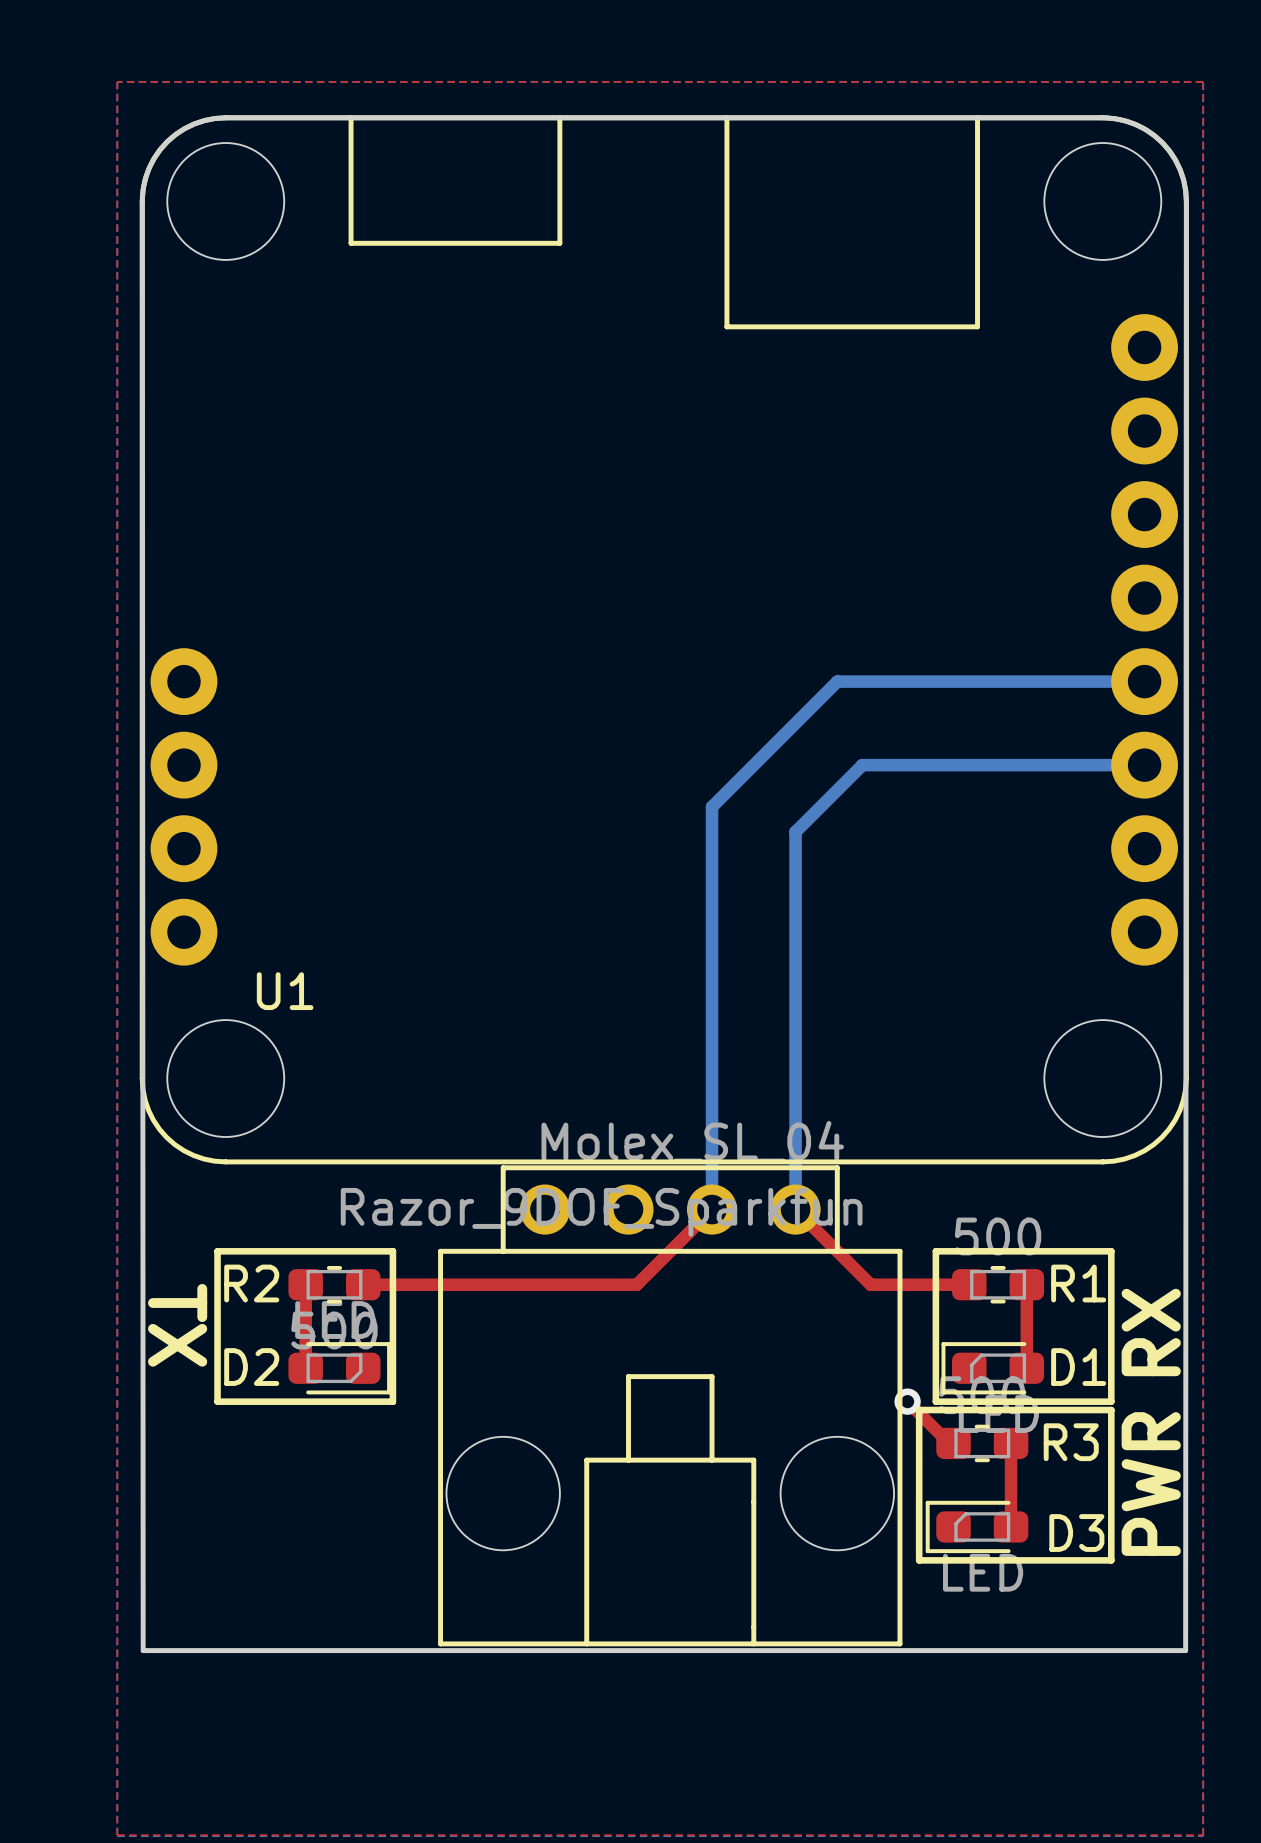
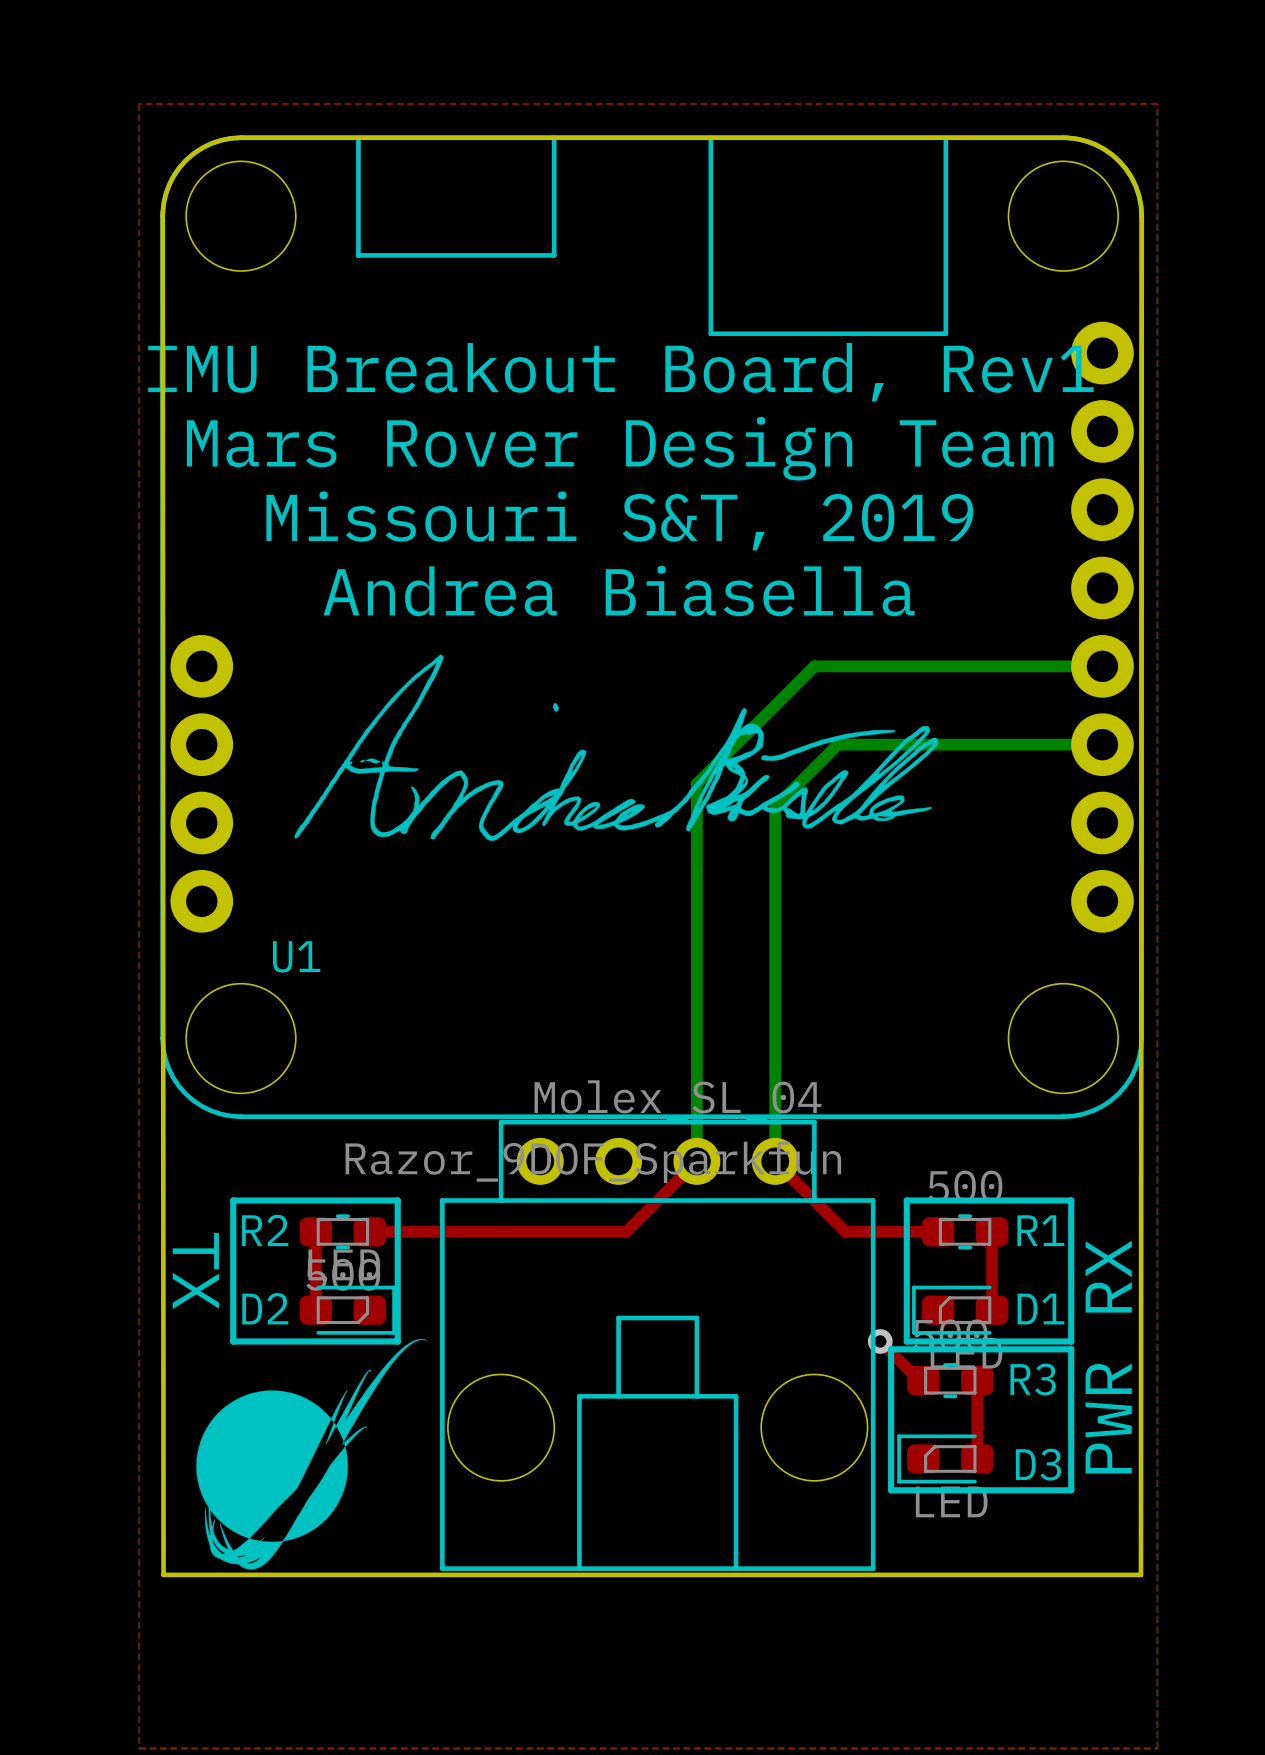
text: none -> IMU Breakout Board, Rev1 (620, 372)
text: none -> Mars Rover Design Team (620, 448)
text: none -> Missouri S&T, 2019 (619, 520)
text: none -> Andrea Biasella (619, 591)
drawing: none -> [294, 654, 939, 871]
drawing: none -> [196, 1339, 427, 1570]

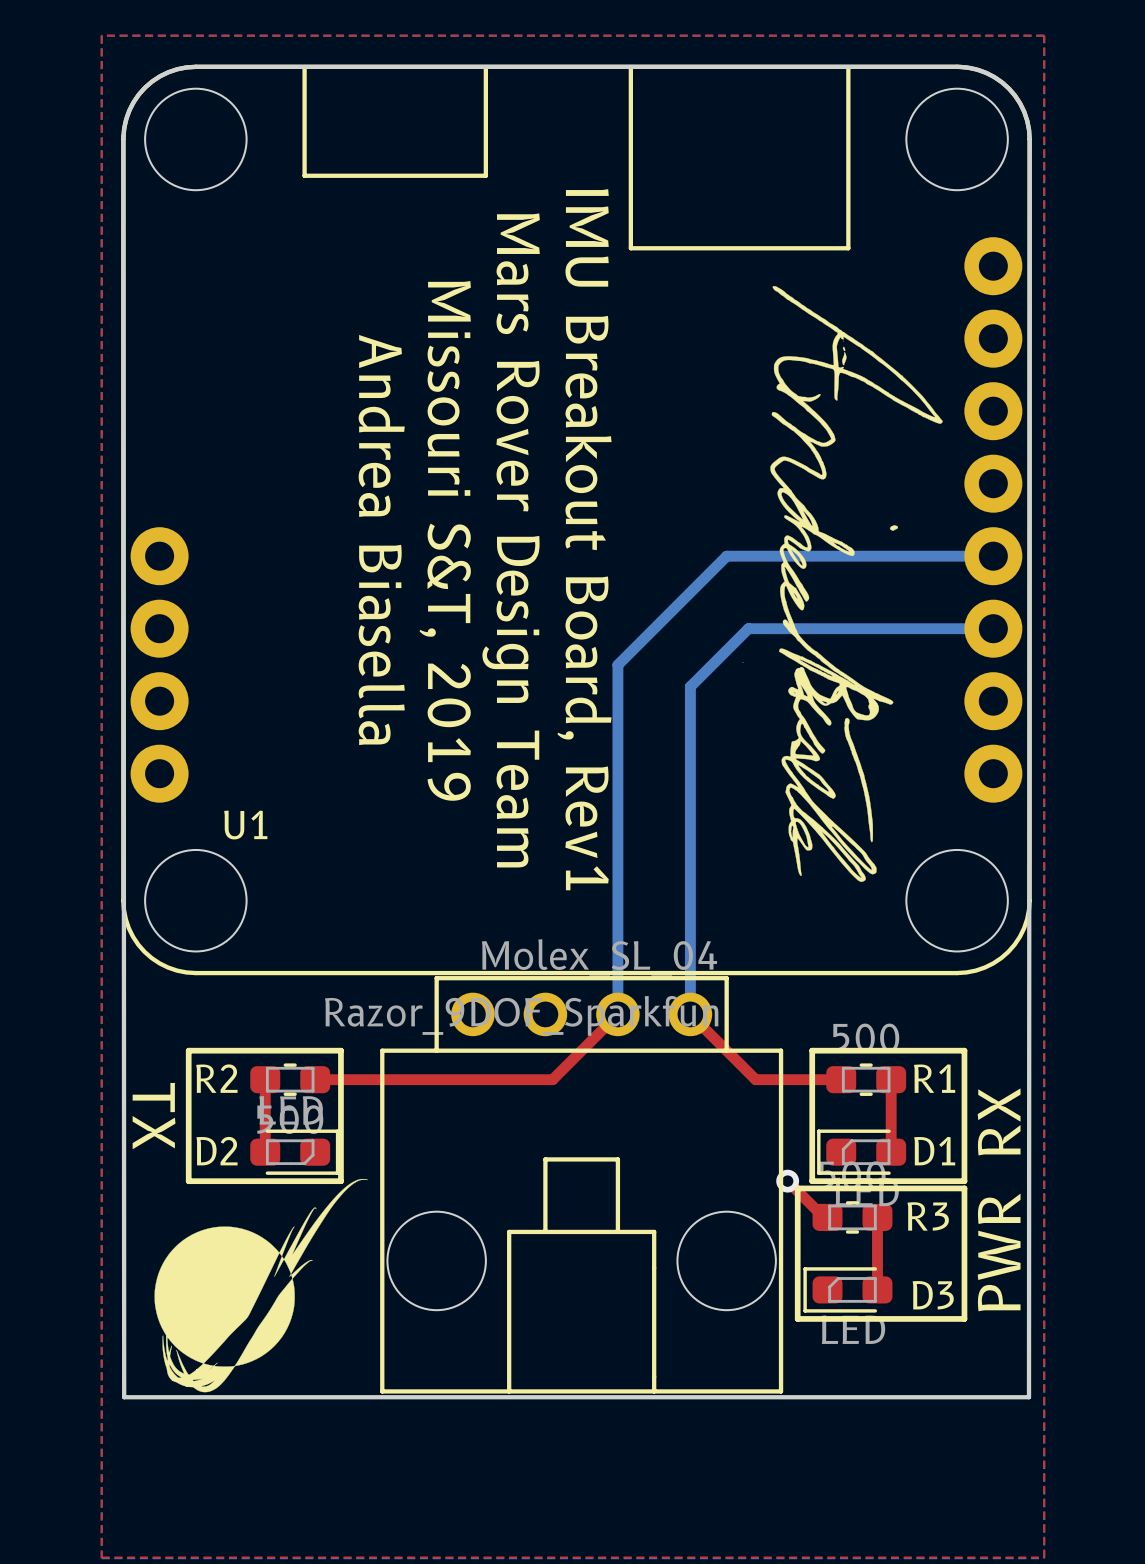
text rotation: 0° (620, 372) -> 90° clockwise (584, 539)
drawing: none -> [742, 285, 943, 882]
text rotation: 0° (620, 448) -> 90° clockwise (511, 540)
text rotation: 0° (619, 520) -> 90° clockwise (445, 540)
text rotation: 0° (619, 591) -> 90° clockwise (381, 540)
drawing: [294, 654, 939, 871] -> none

